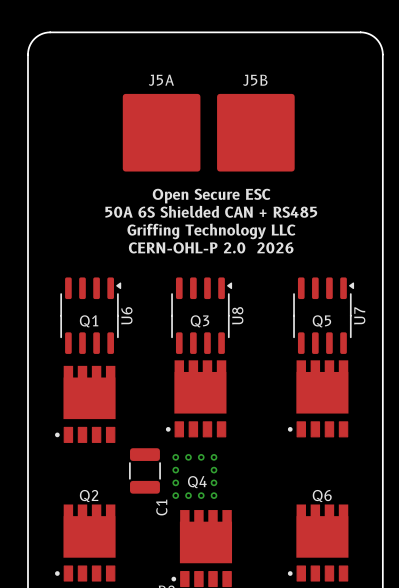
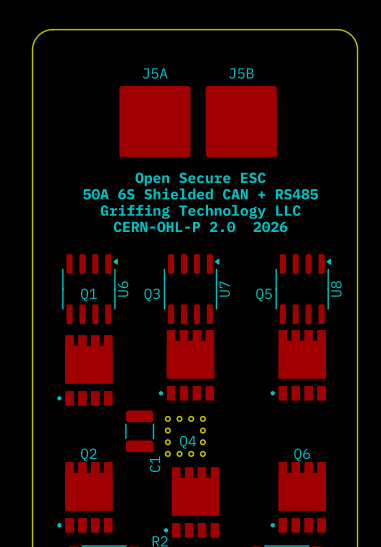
U8 name: U8 (237, 315) -> U7 (224, 289)
U7 name: U7 (359, 315) -> U8 (336, 288)
Q3 name position: Q3 (199, 321) -> Q3 (152, 294)
Q5 name position: Q5 (321, 321) -> Q5 (264, 294)

